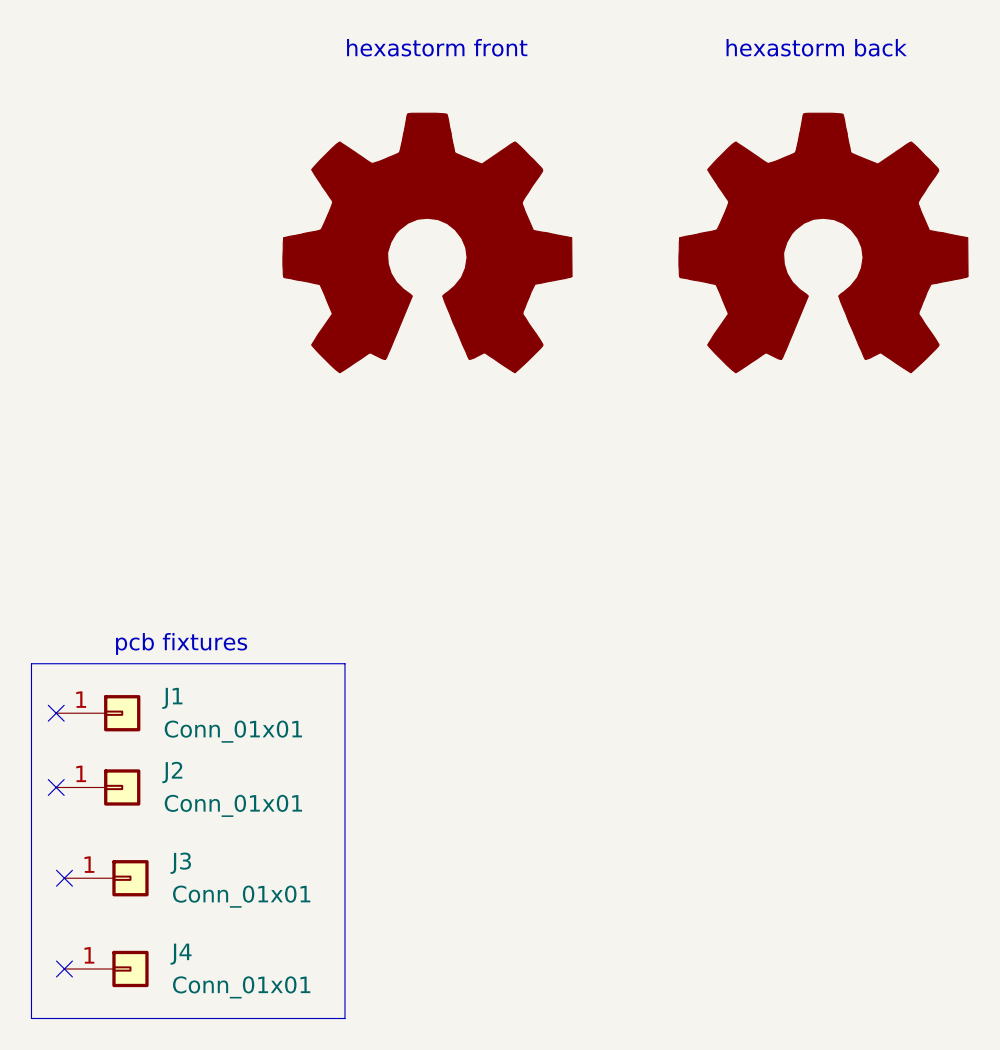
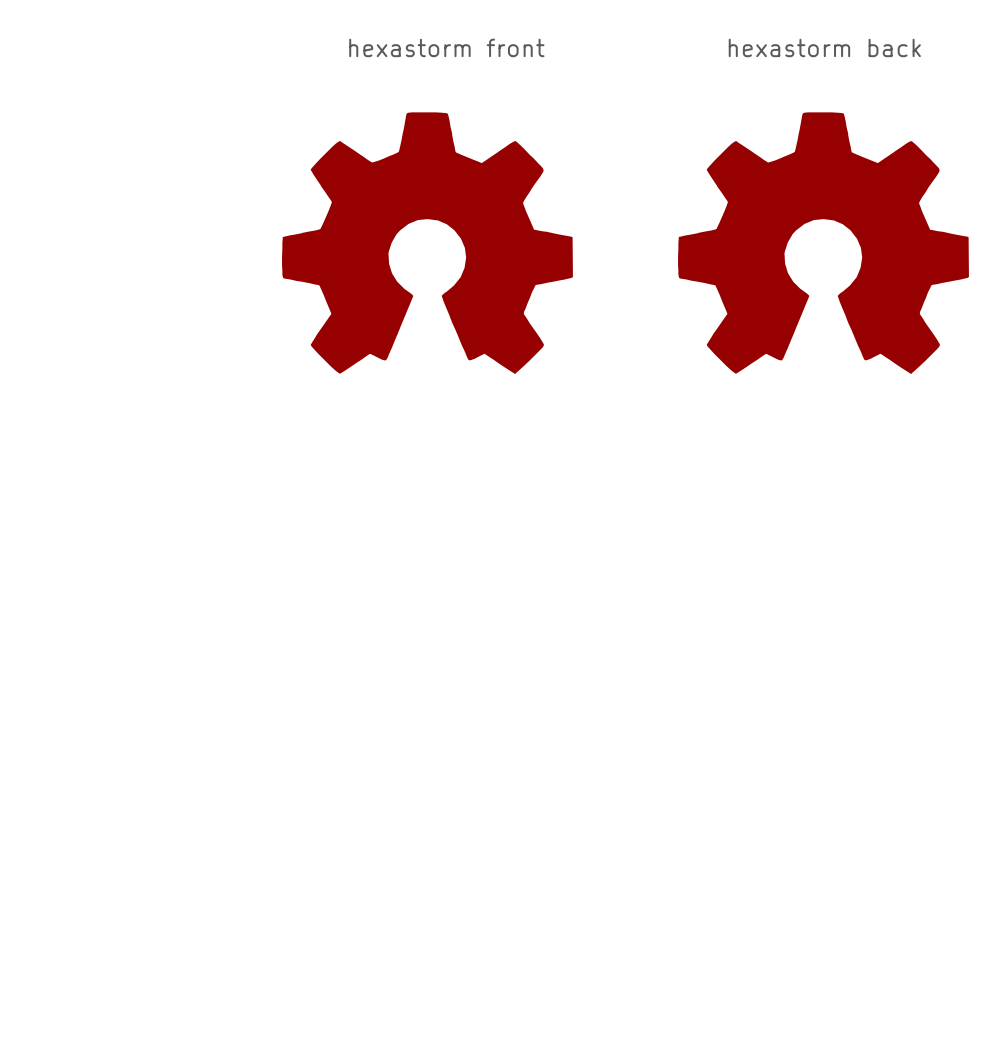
text: pcb fixtures (181, 643) -> none
line: (31, 663) (344, 663) (344, 1018) (31, 1018) (31, 663) -> none
no-connect mark: (56, 713) -> none
J1: Conn_01x01 (98, 713) -> none
no-connect mark: (56, 787) -> none
J2: Conn_01x01 (98, 787) -> none
no-connect mark: (64, 878) -> none
J3: Conn_01x01 (106, 878) -> none
no-connect mark: (64, 968) -> none
J4: Conn_01x01 (106, 968) -> none

